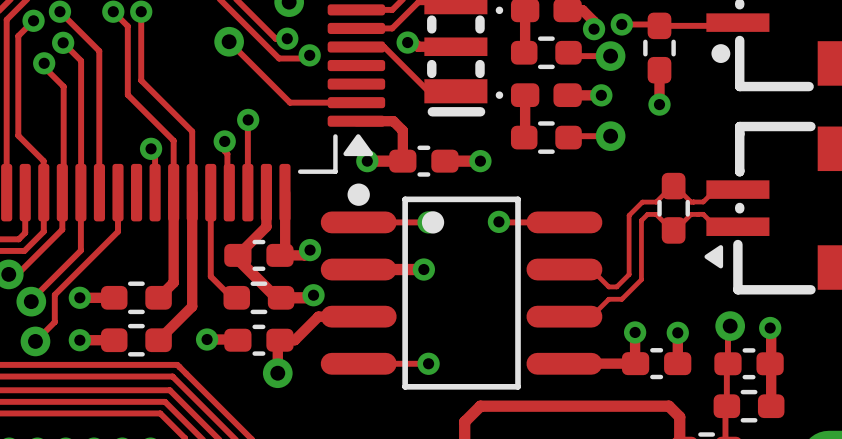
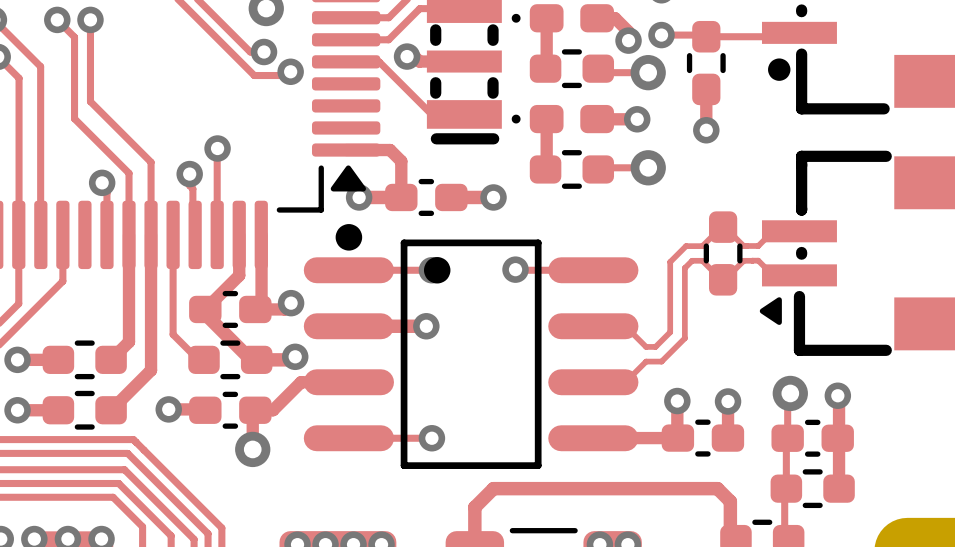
track: (229, 41) (290, 102) (356, 102) -> none
via: (229, 41) -> none

